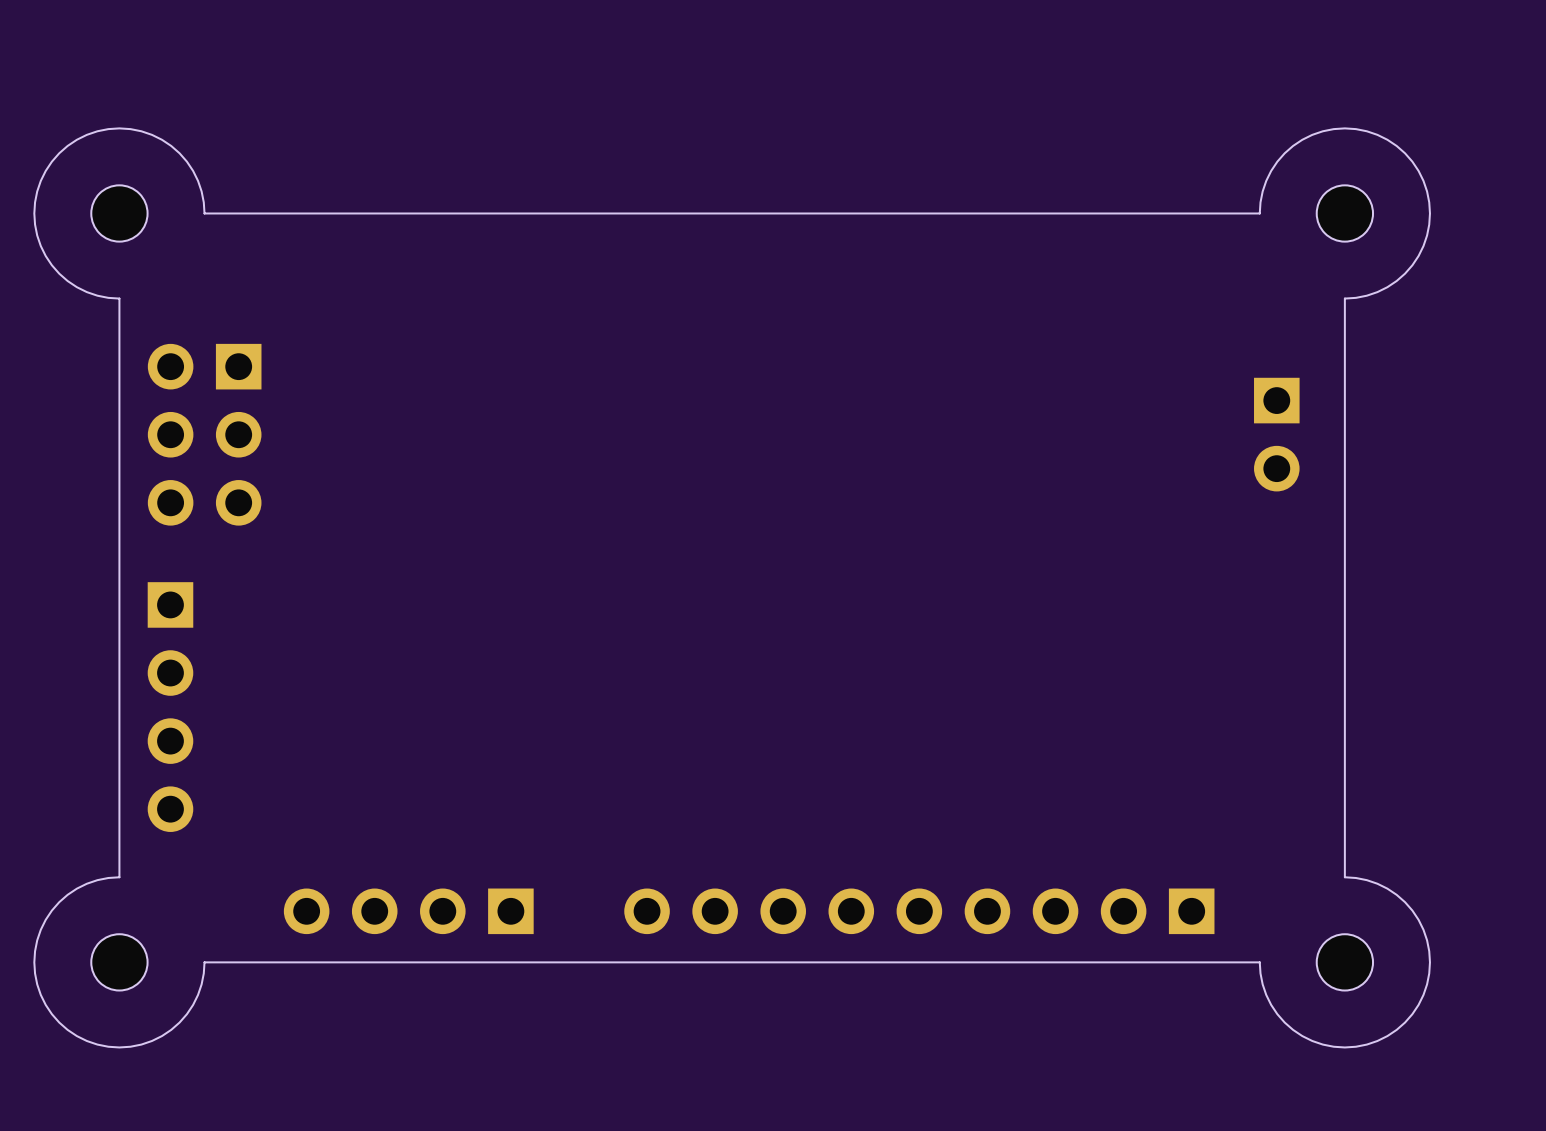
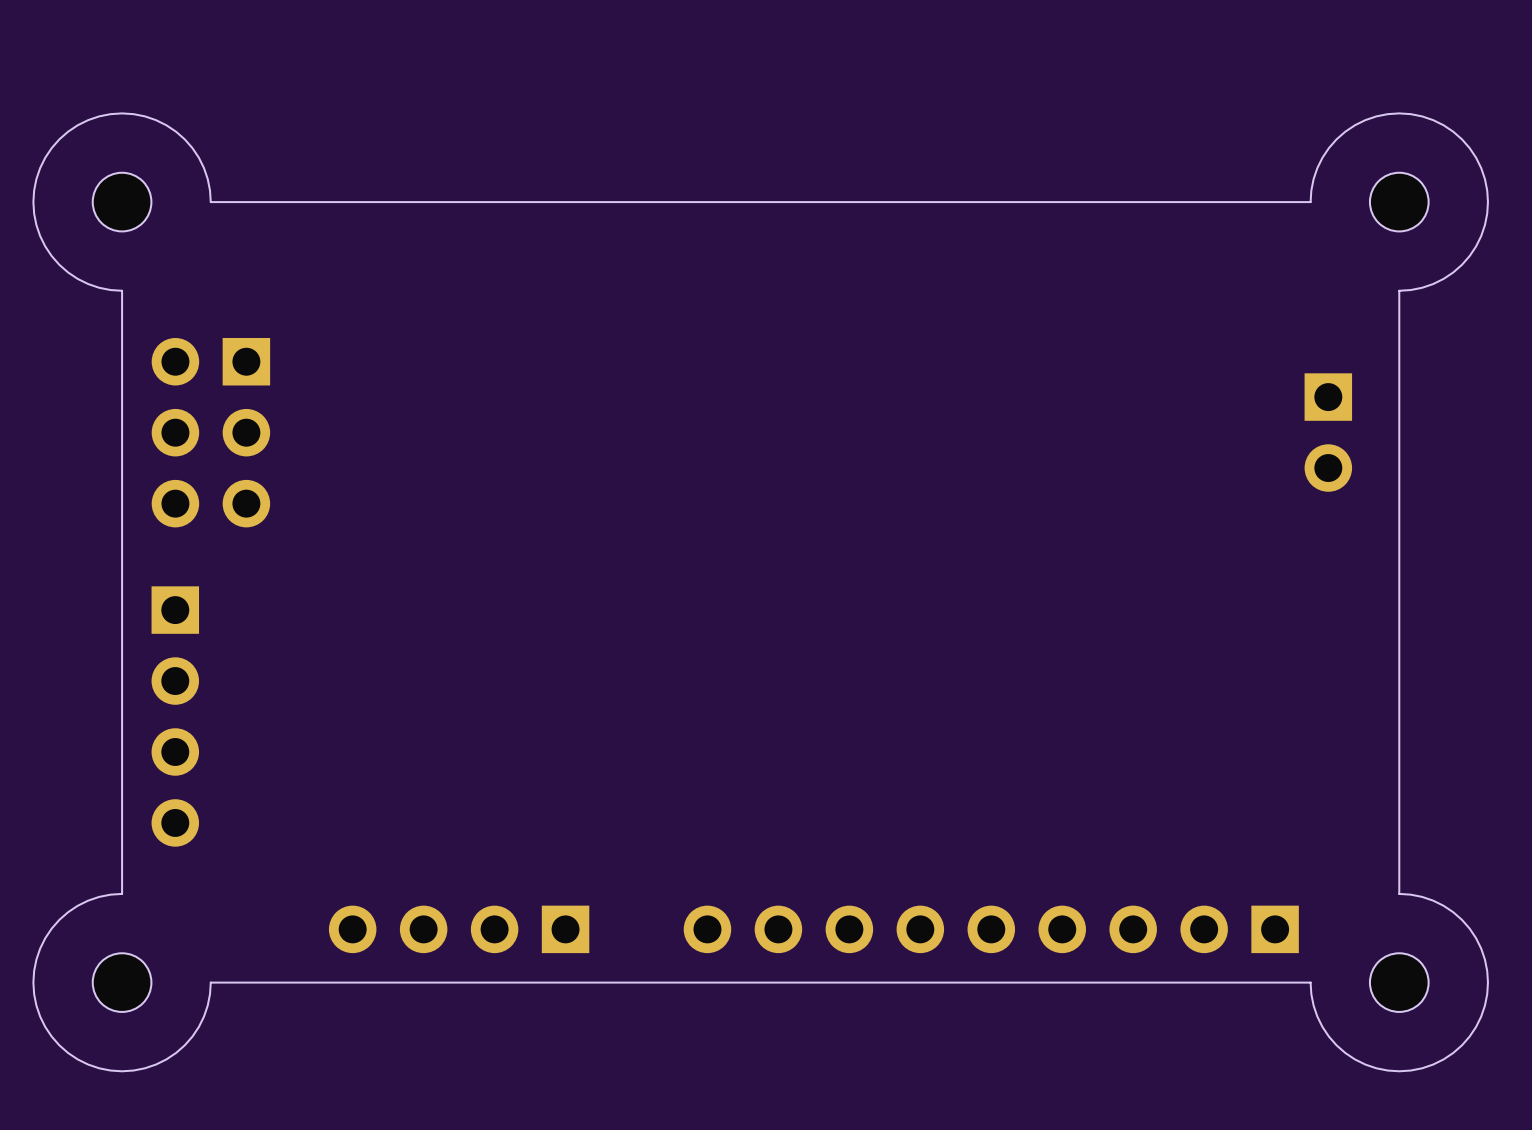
part position: (408, 911) -> (459, 929)
part position: (919, 911) -> (991, 929)

